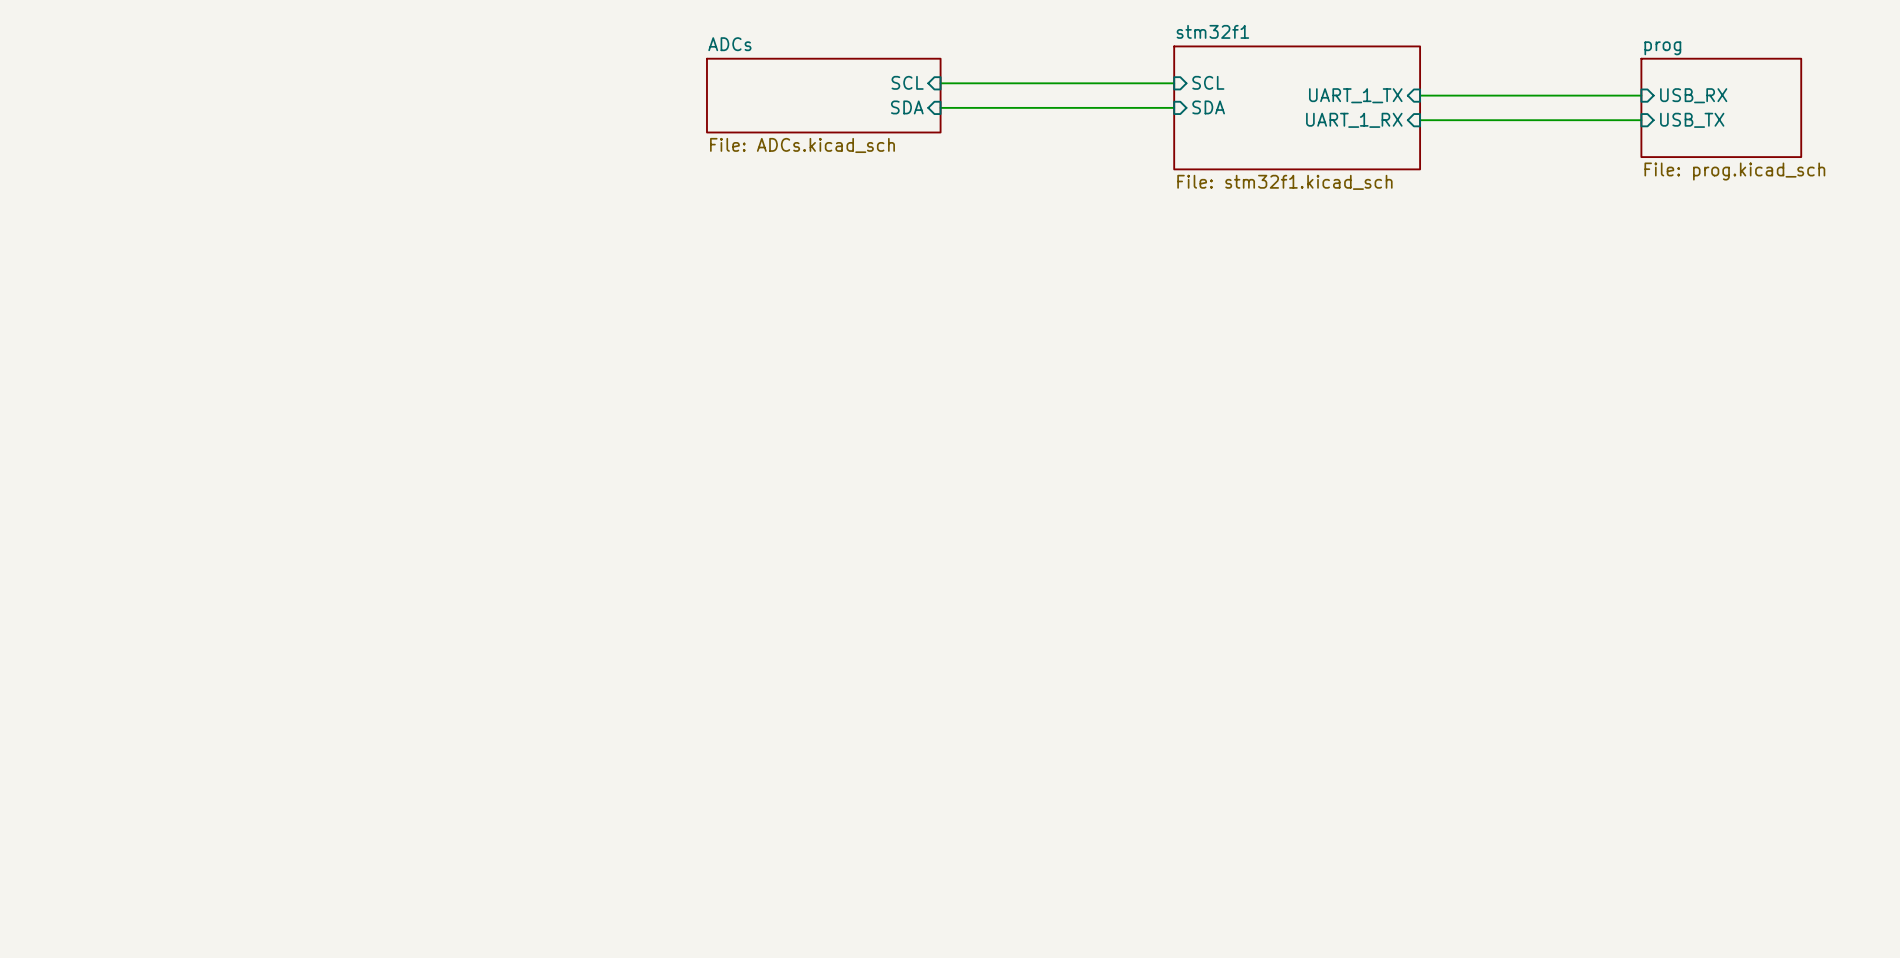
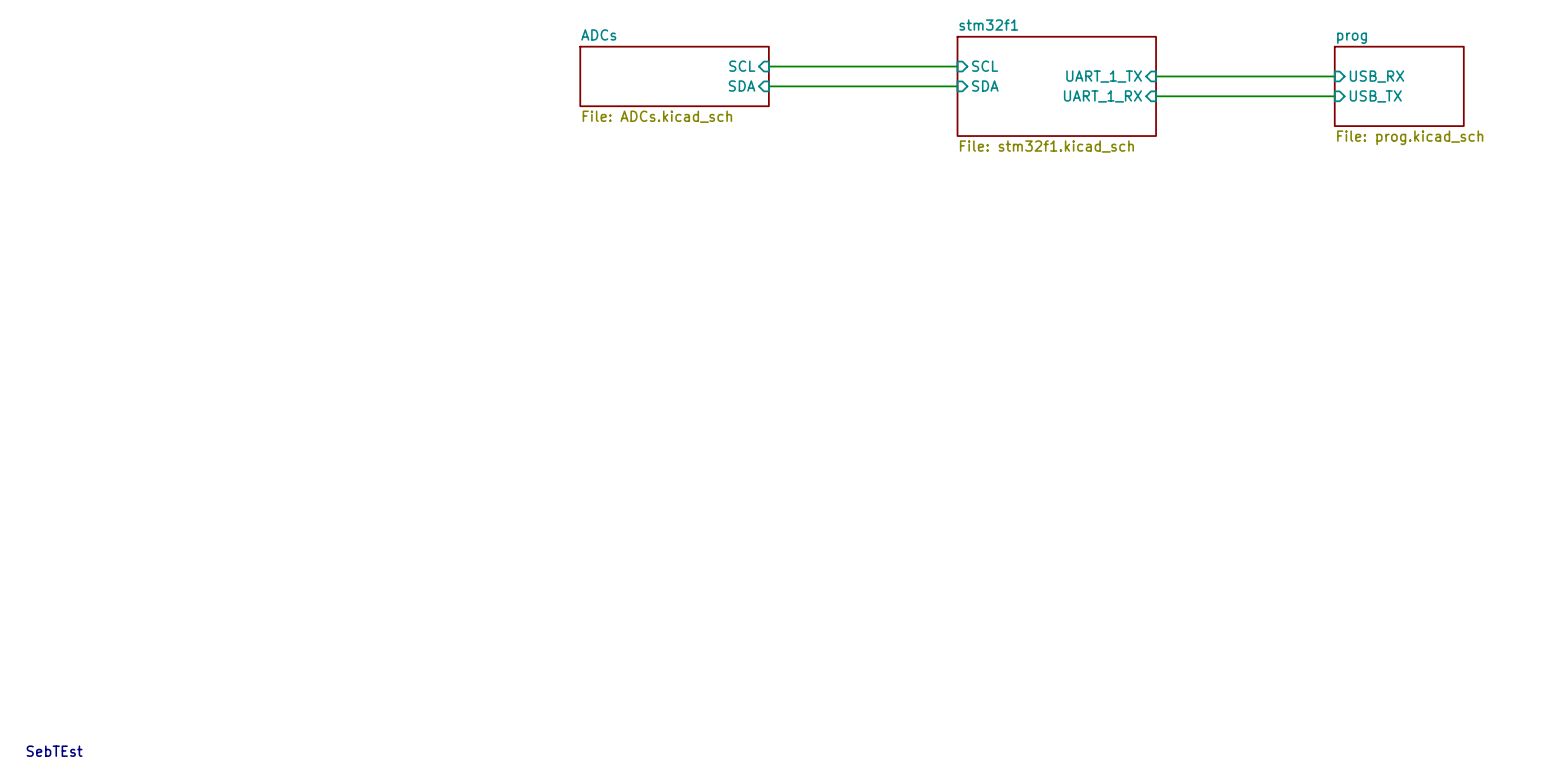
text: none -> SebTEst (54, 751)

